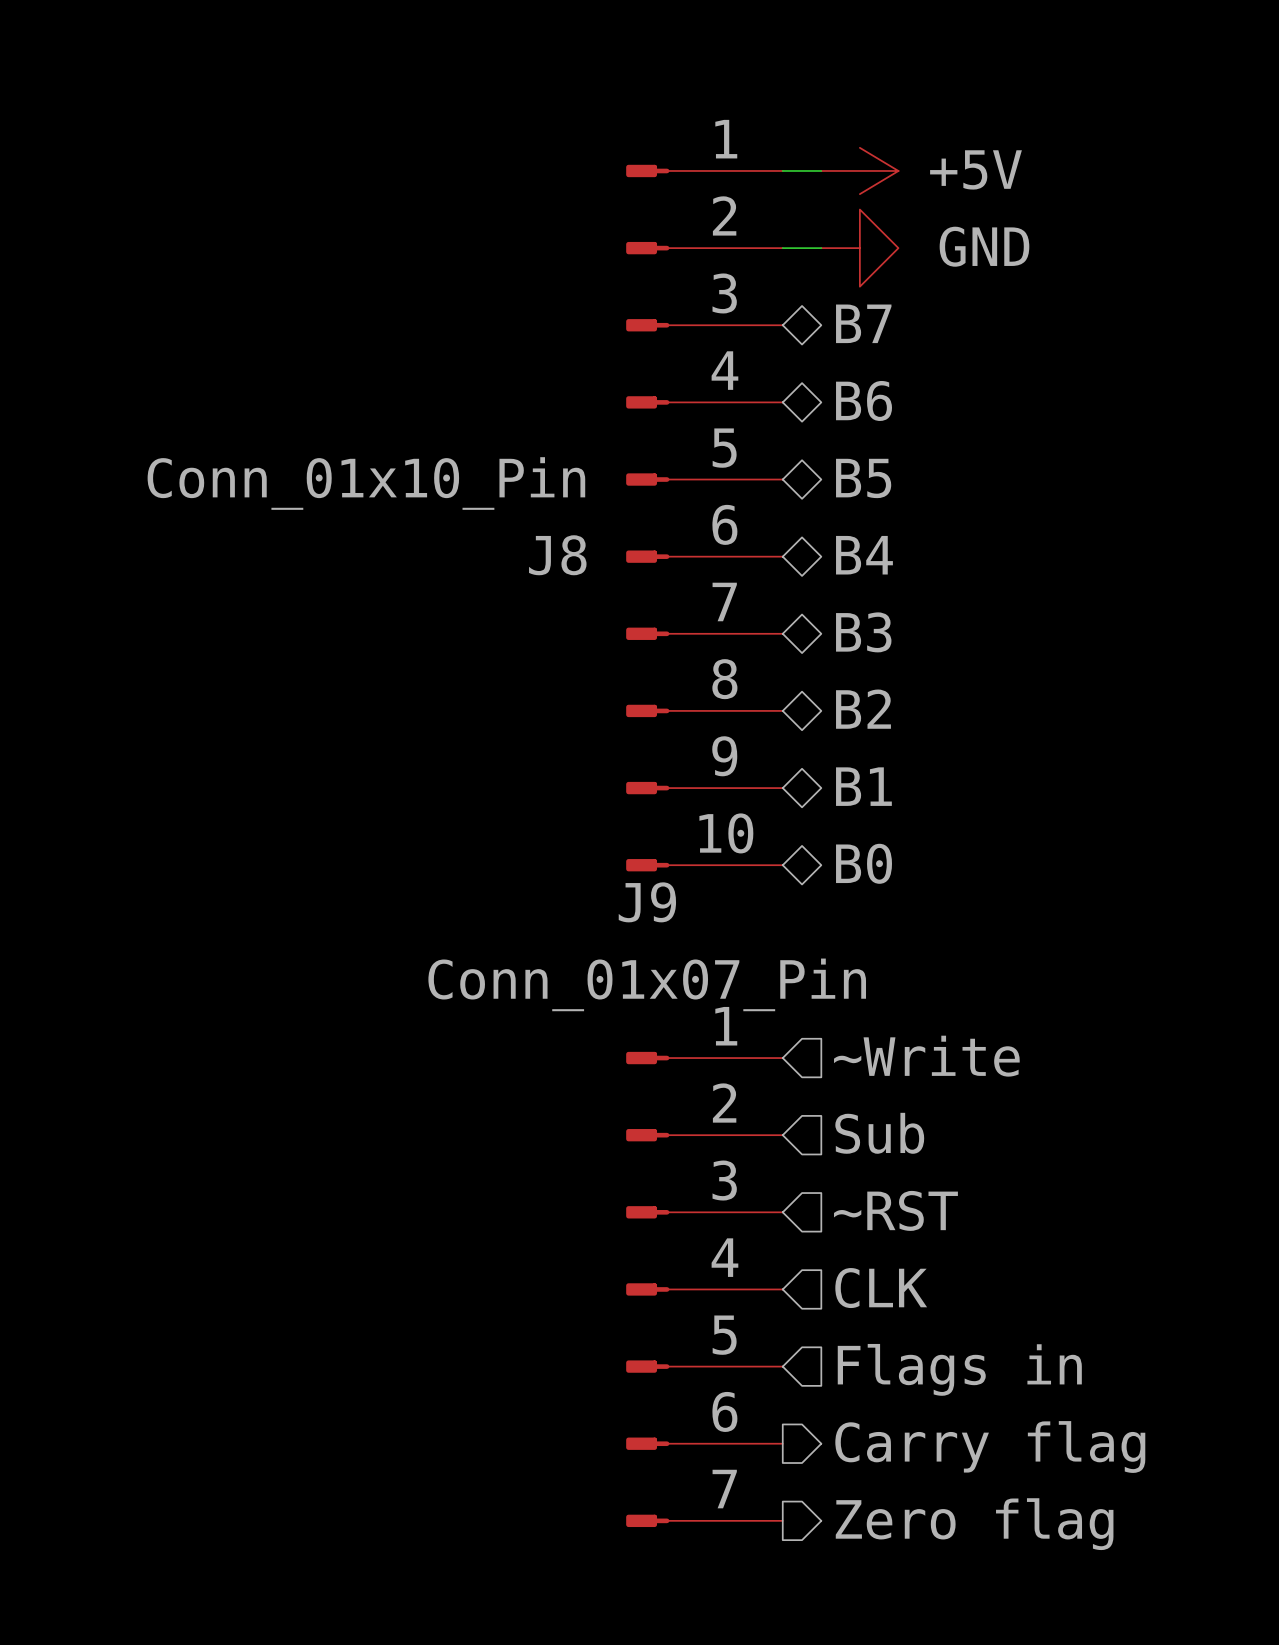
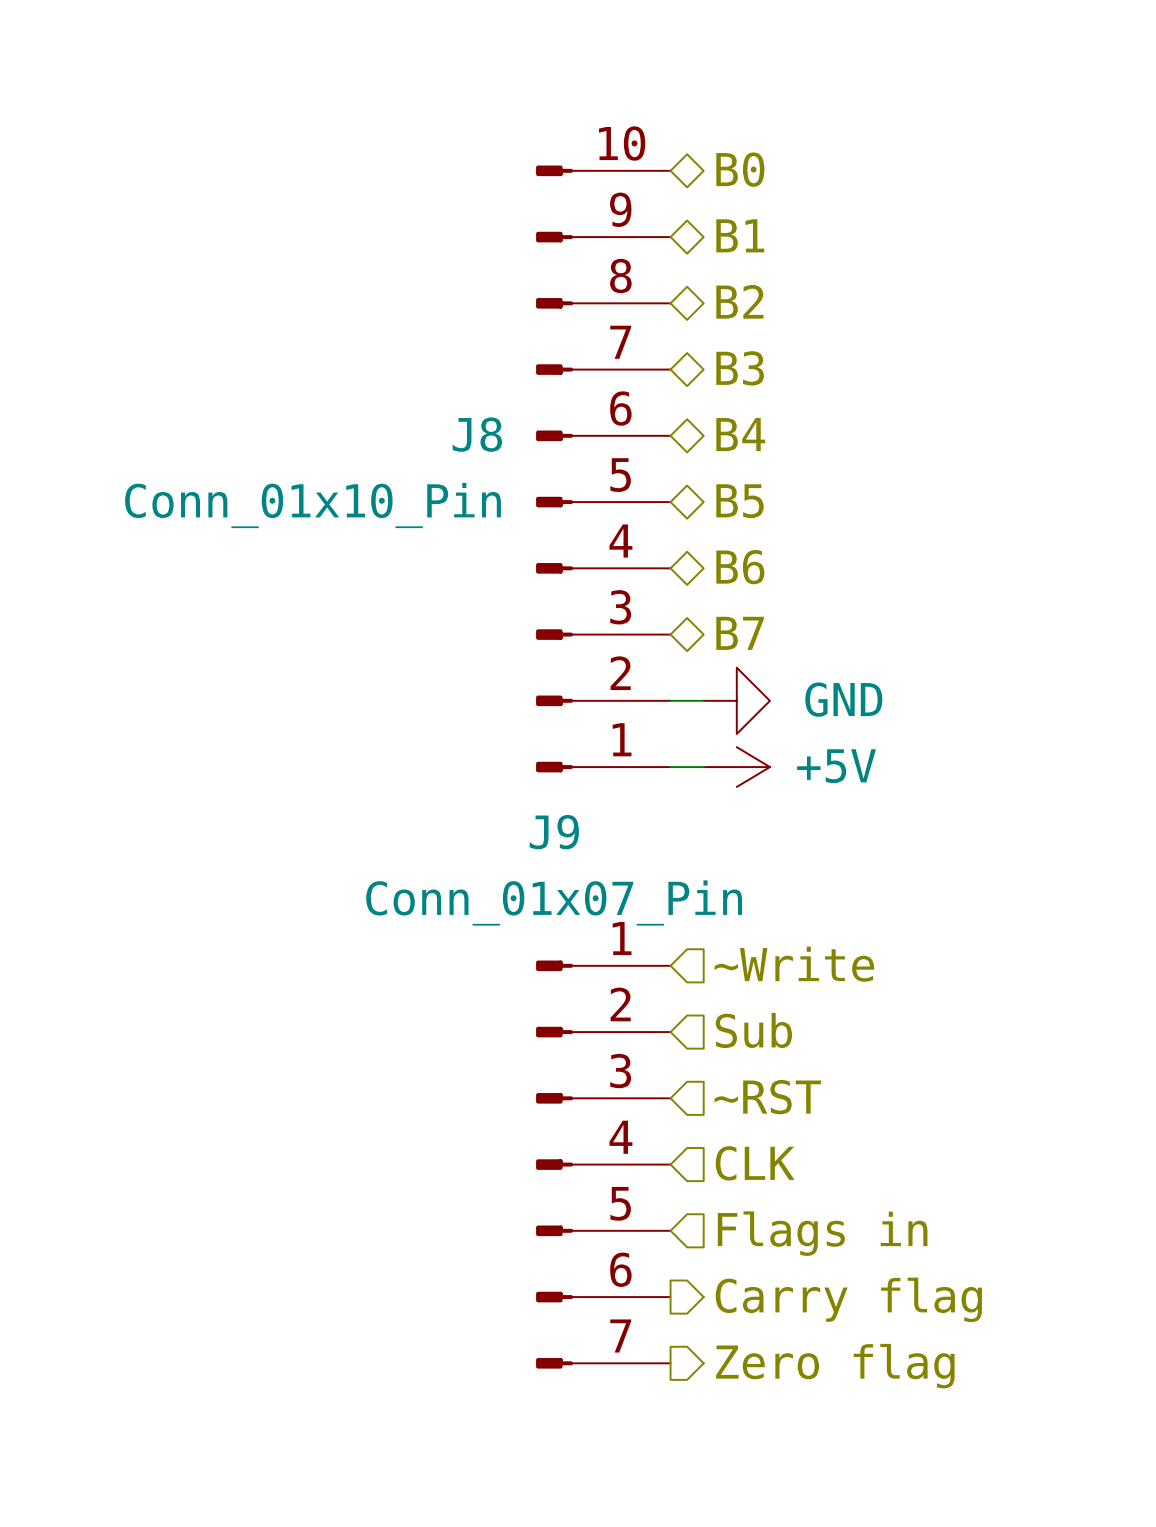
wire: (782, 170) (821, 170) -> (670, 700) (703, 700)
power symbol position: +5V (859, 170) -> +5V (736, 767)
wire: (782, 248) (821, 248) -> (670, 767) (703, 767)
power symbol position: GND (859, 248) -> GND (736, 700)
hierarchical label position: B7 (863, 323) -> B7 (740, 633)
hierarchical label position: B6 (864, 400) -> B6 (740, 567)
hierarchical label position: B5 (863, 478) -> B5 (740, 501)
J8 flip: as is (647, 518) -> up-down (554, 468)
hierarchical label position: B4 (864, 555) -> B4 (740, 434)
hierarchical label position: B3 (863, 632) -> B3 (740, 368)
hierarchical label position: B2 (863, 709) -> B2 (739, 301)
hierarchical label position: B1 (863, 786) -> B1 (740, 235)
hierarchical label position: B0 (864, 863) -> B0 (740, 169)

